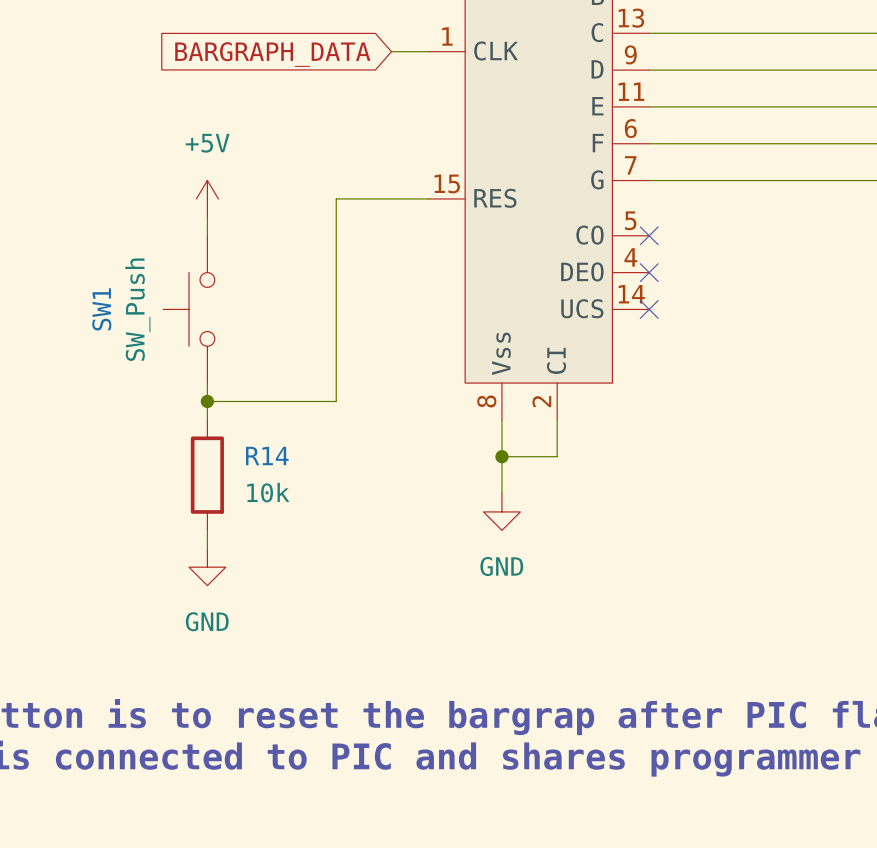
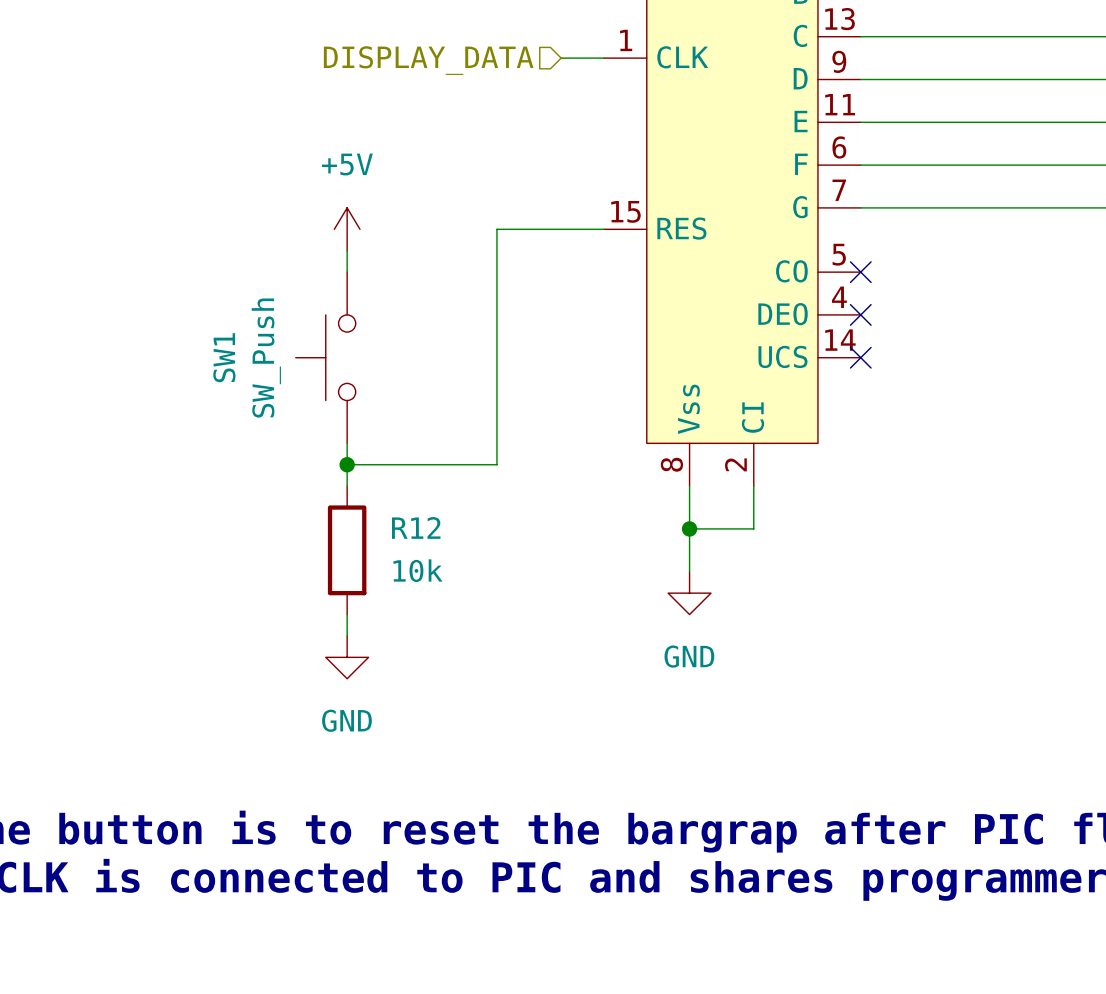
hierarchical label: none -> DISPLAY_DATA (428, 60)
global label: BARGRAPH_DATA (272, 54) -> none
R14 name: R14 (267, 456) -> R12 (416, 527)

